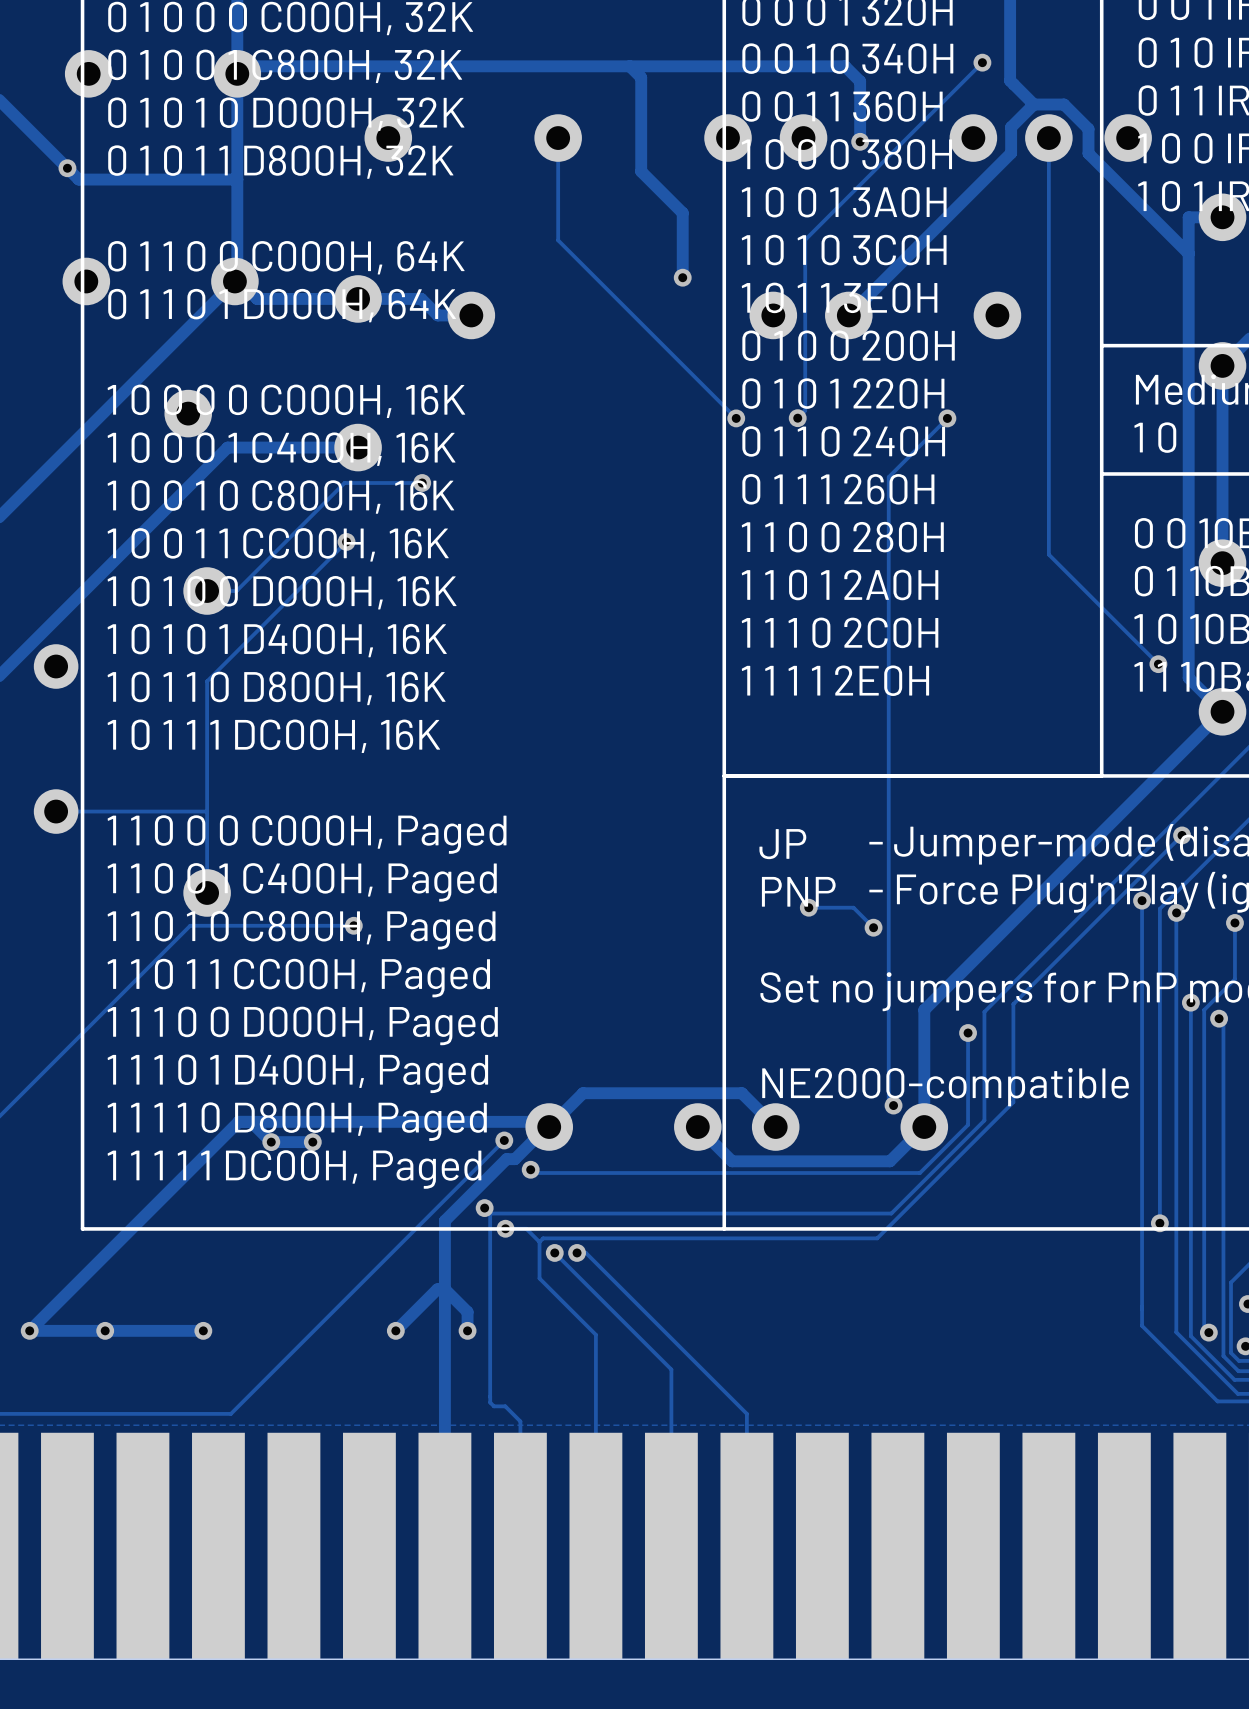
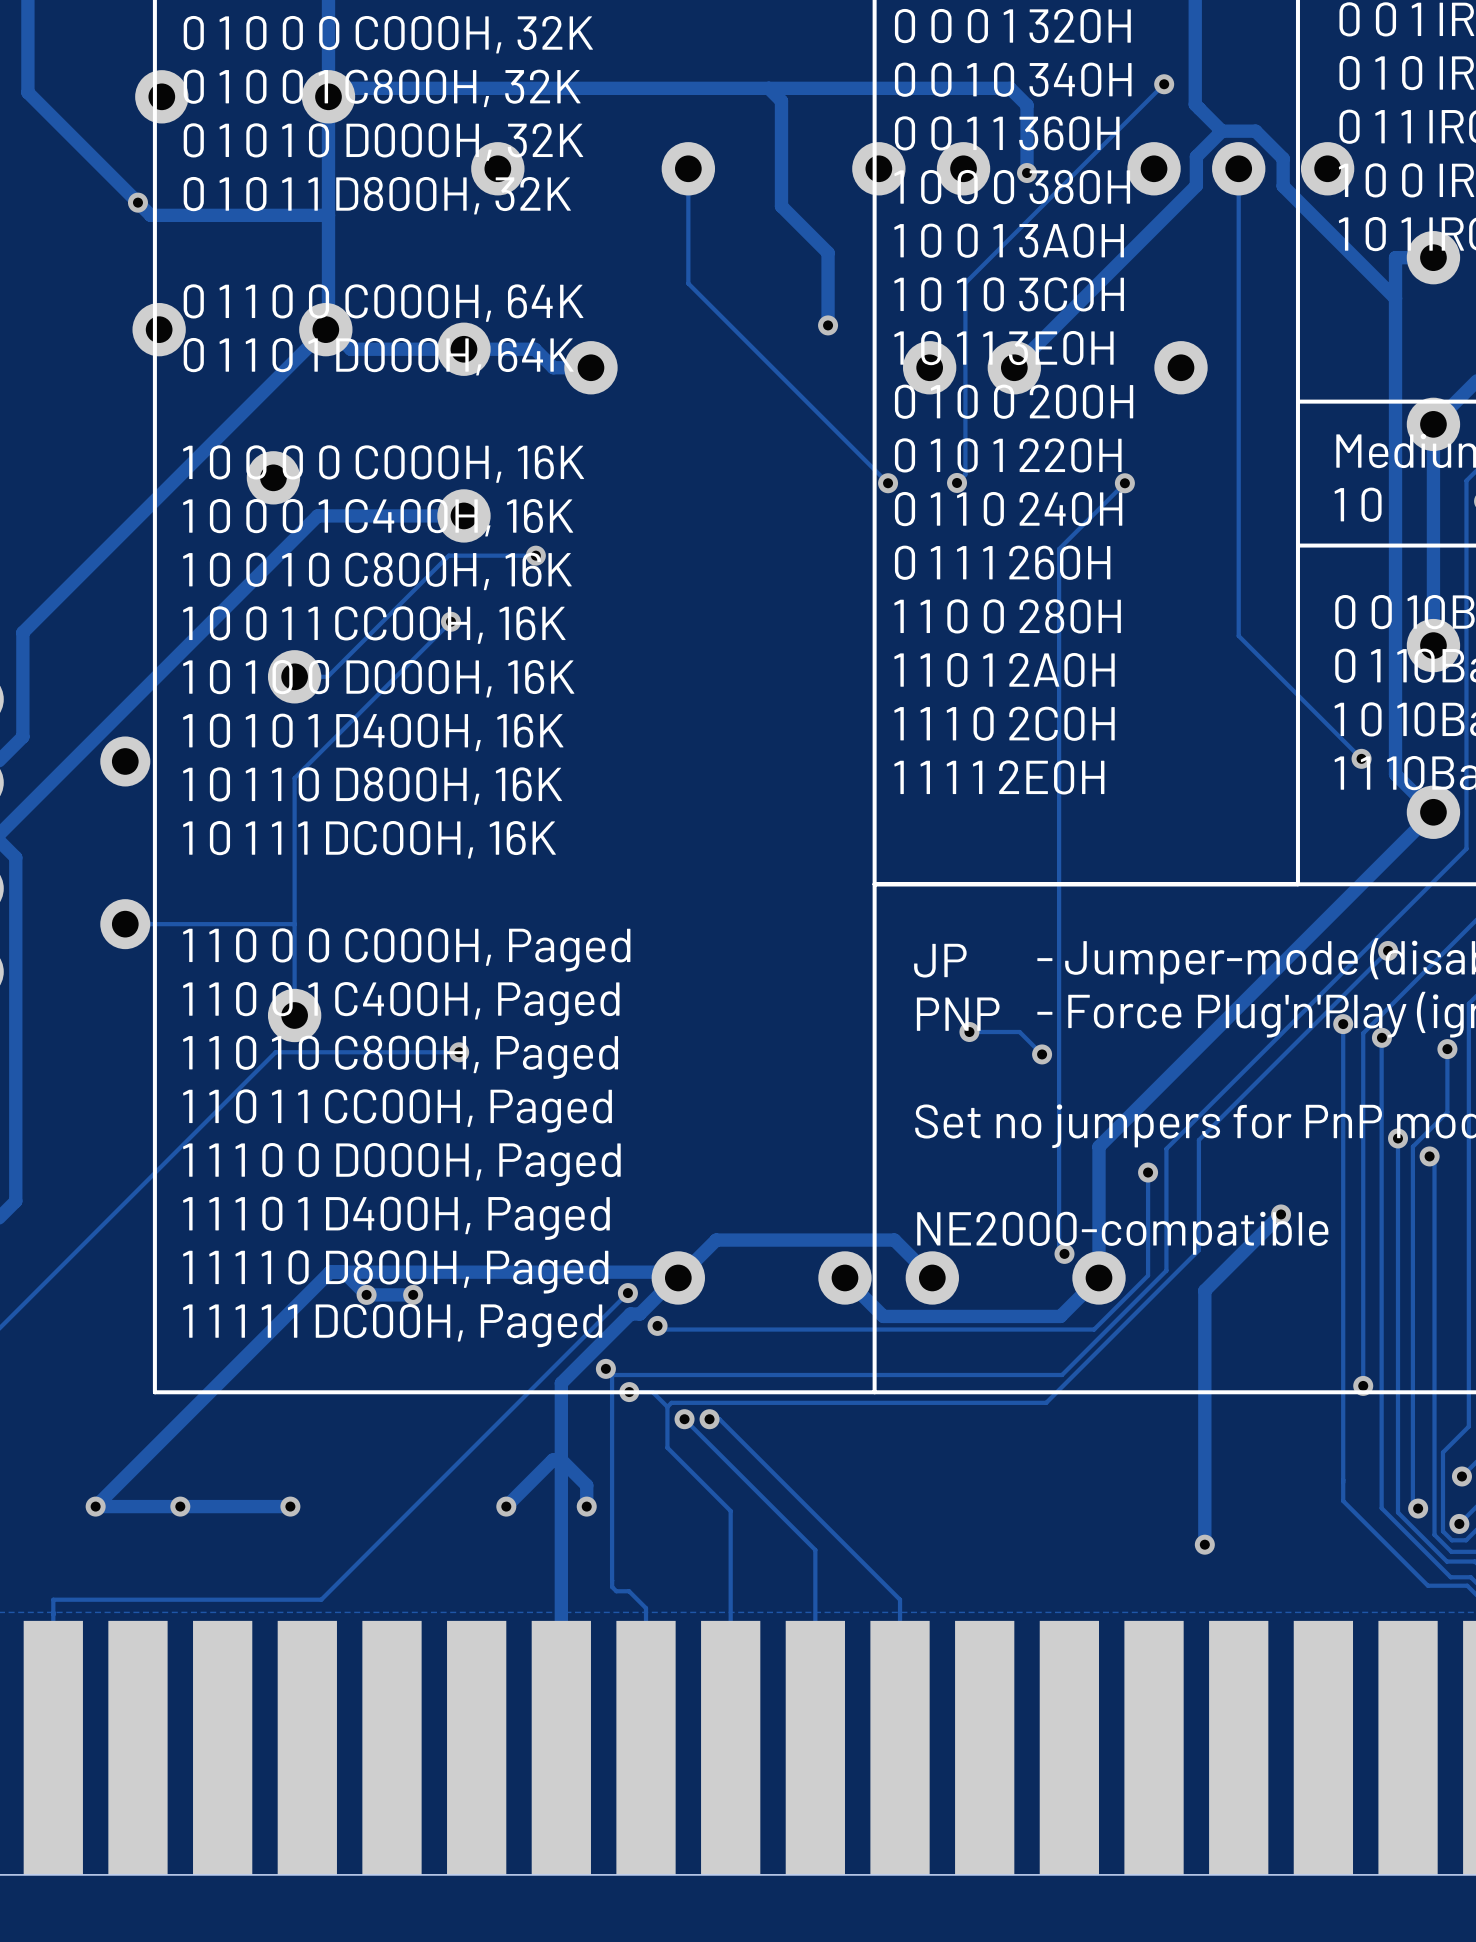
track: none -> (1281, 1214) (1204, 1290) (1204, 1544)
via: none -> (1281, 1214)
via: none -> (1204, 1544)

